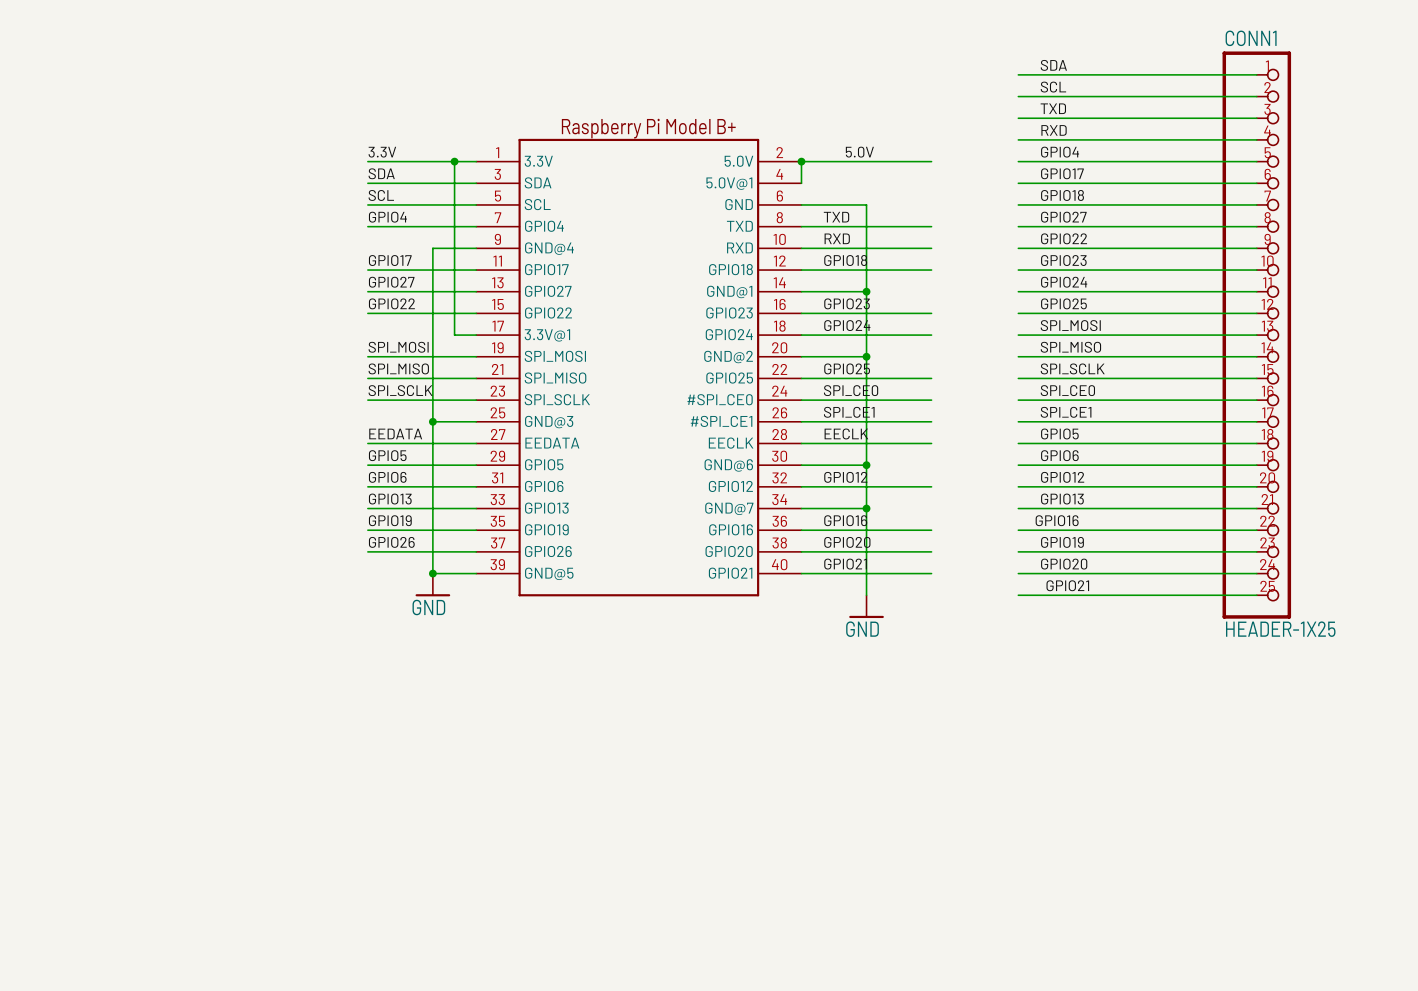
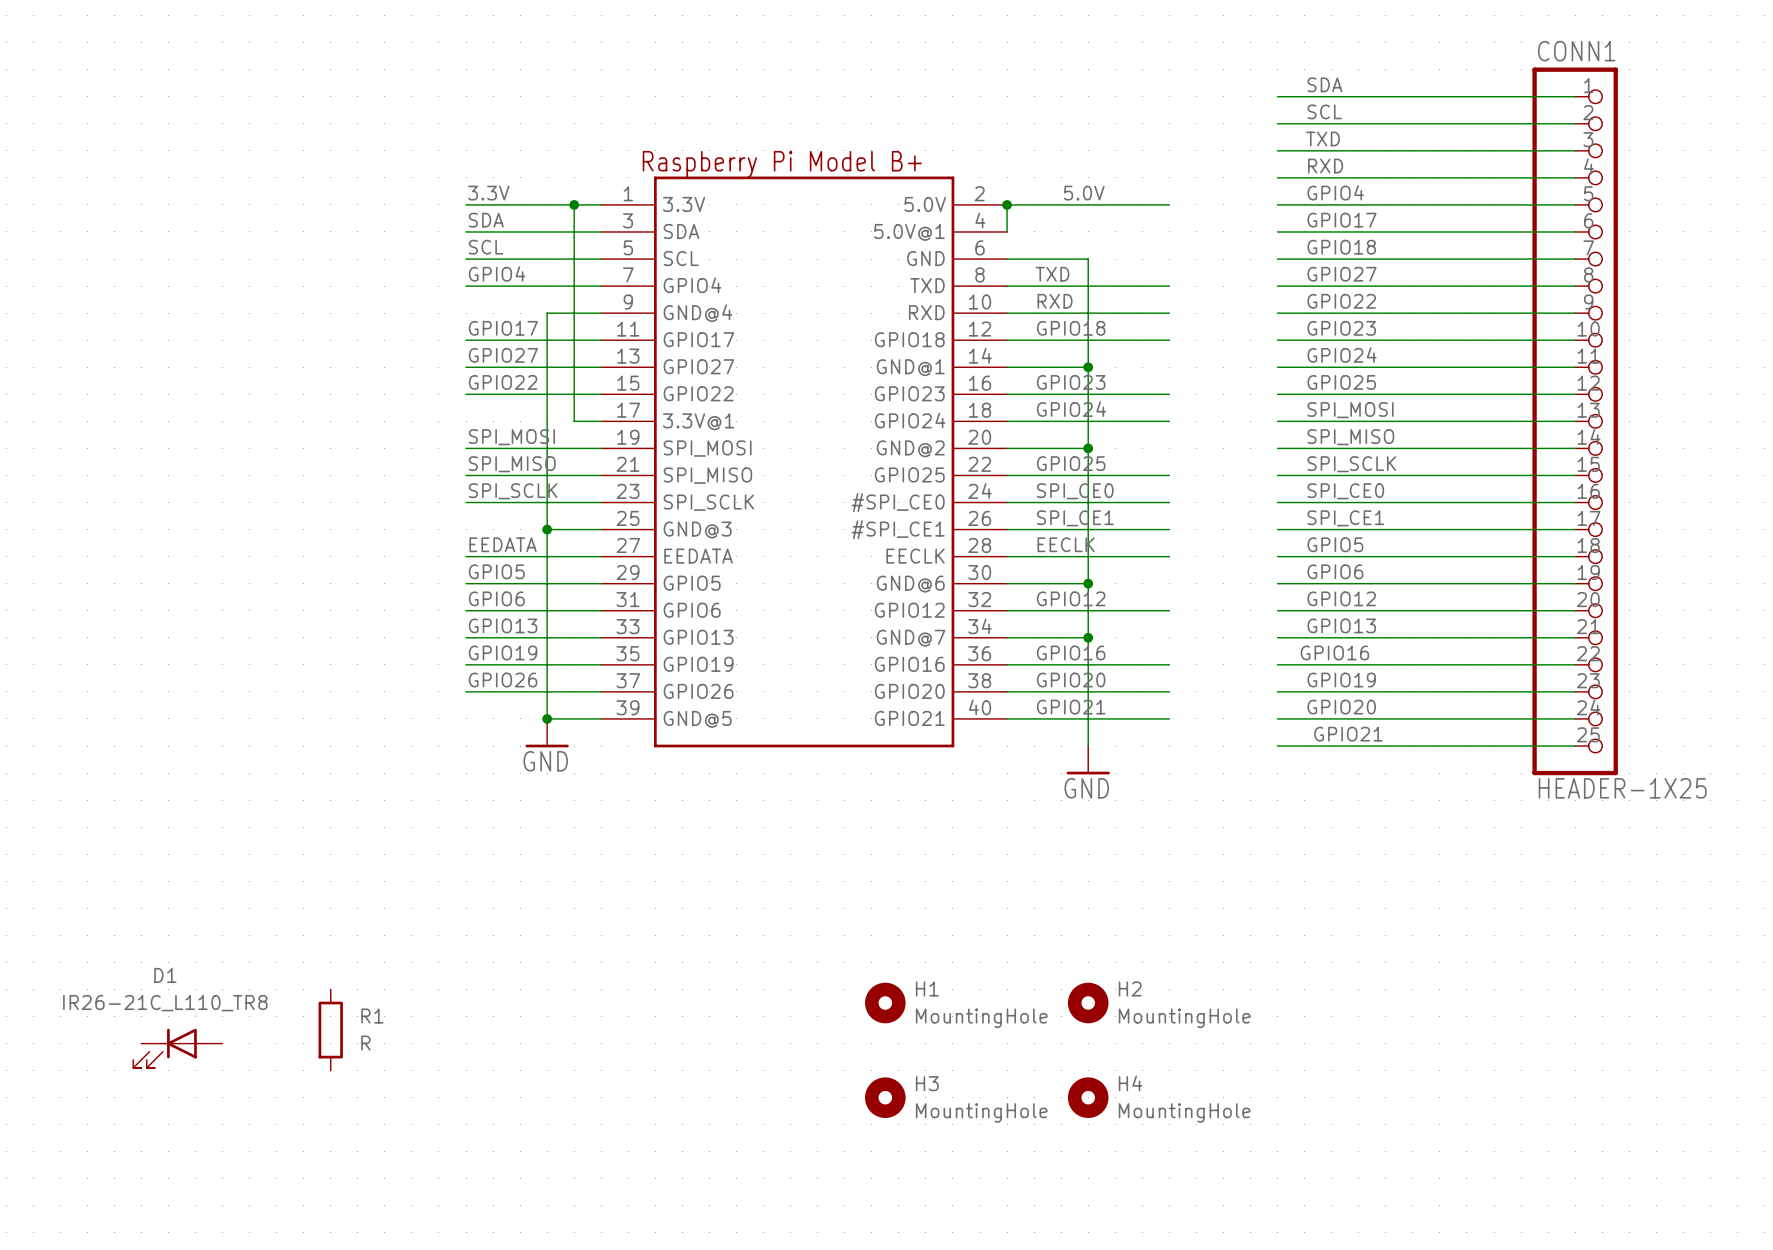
H1: none -> MountingHole (885, 1003)
H2: none -> MountingHole (1088, 1003)
R1: none -> R (330, 1030)
D1: none -> IR26-21C_L110_TR8 (177, 1048)
H3: none -> MountingHole (885, 1097)
H4: none -> MountingHole (1088, 1097)

